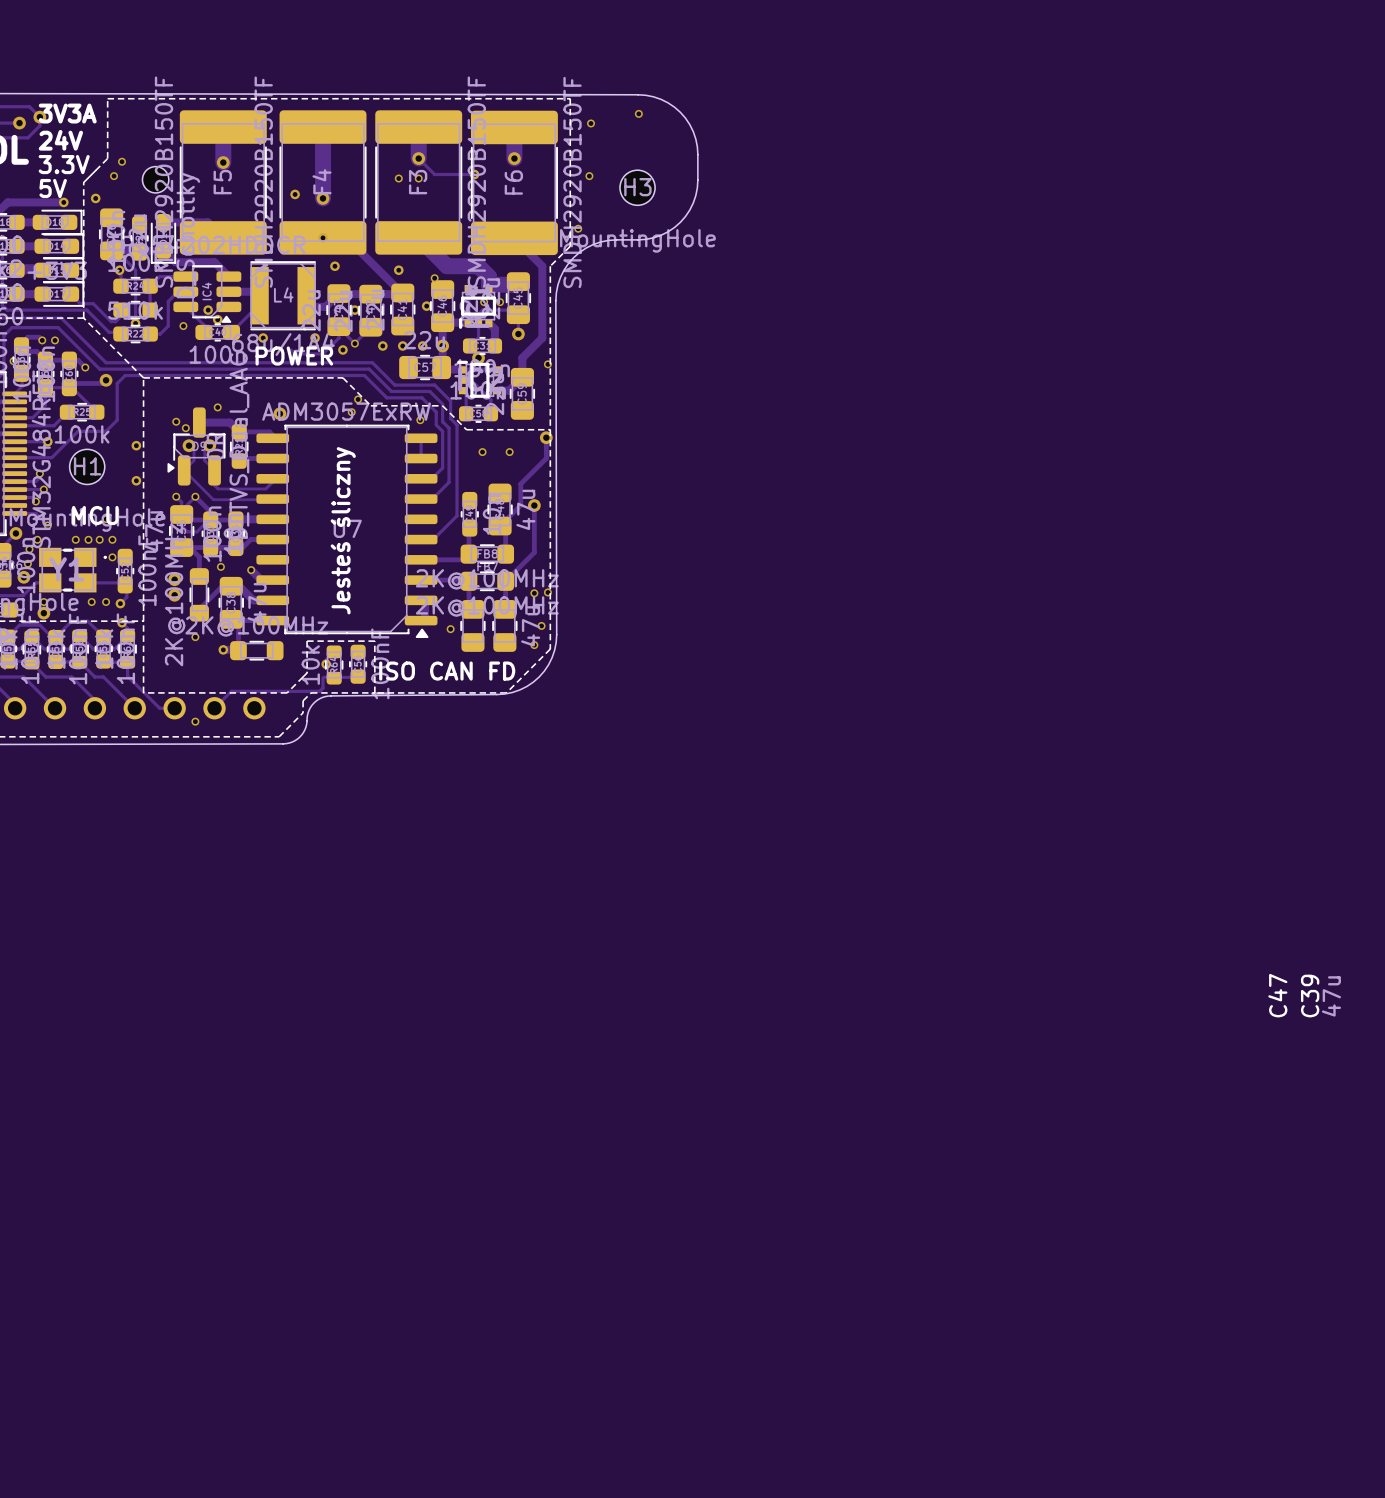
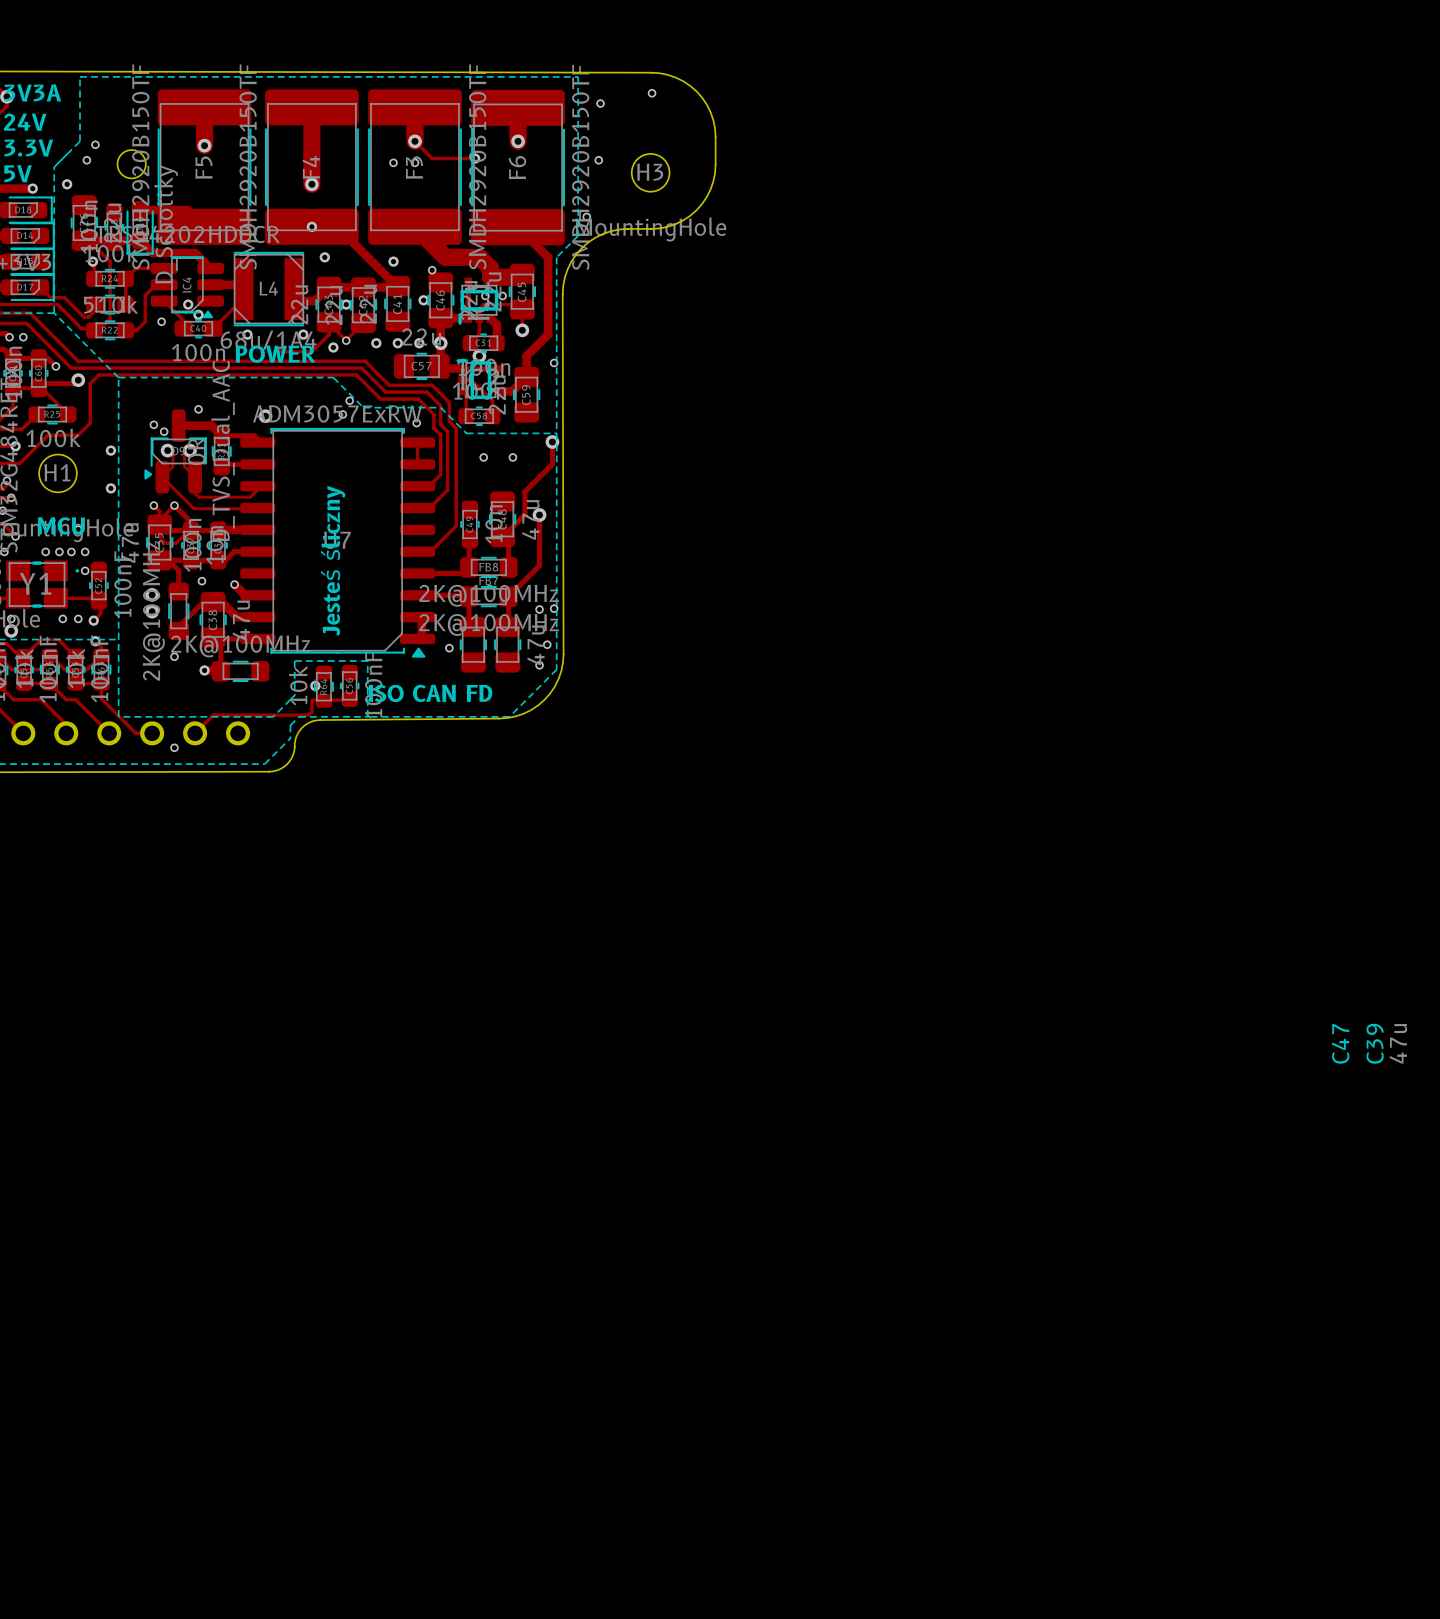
via: (295, 194) -> none
via: (135, 323) -> none

